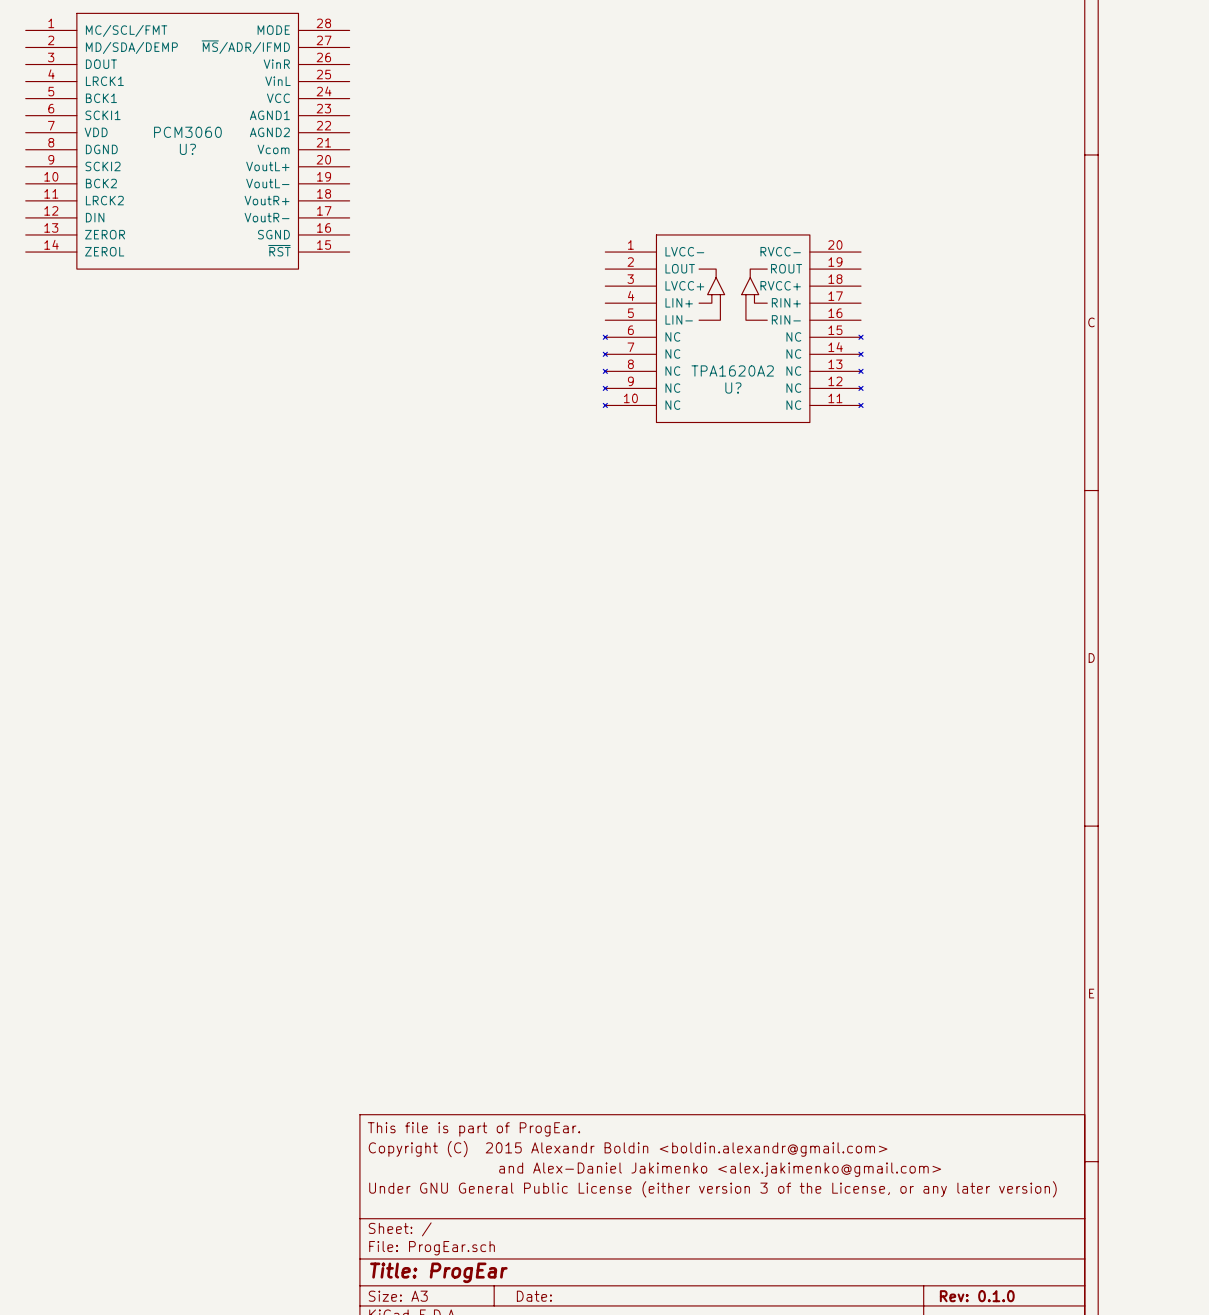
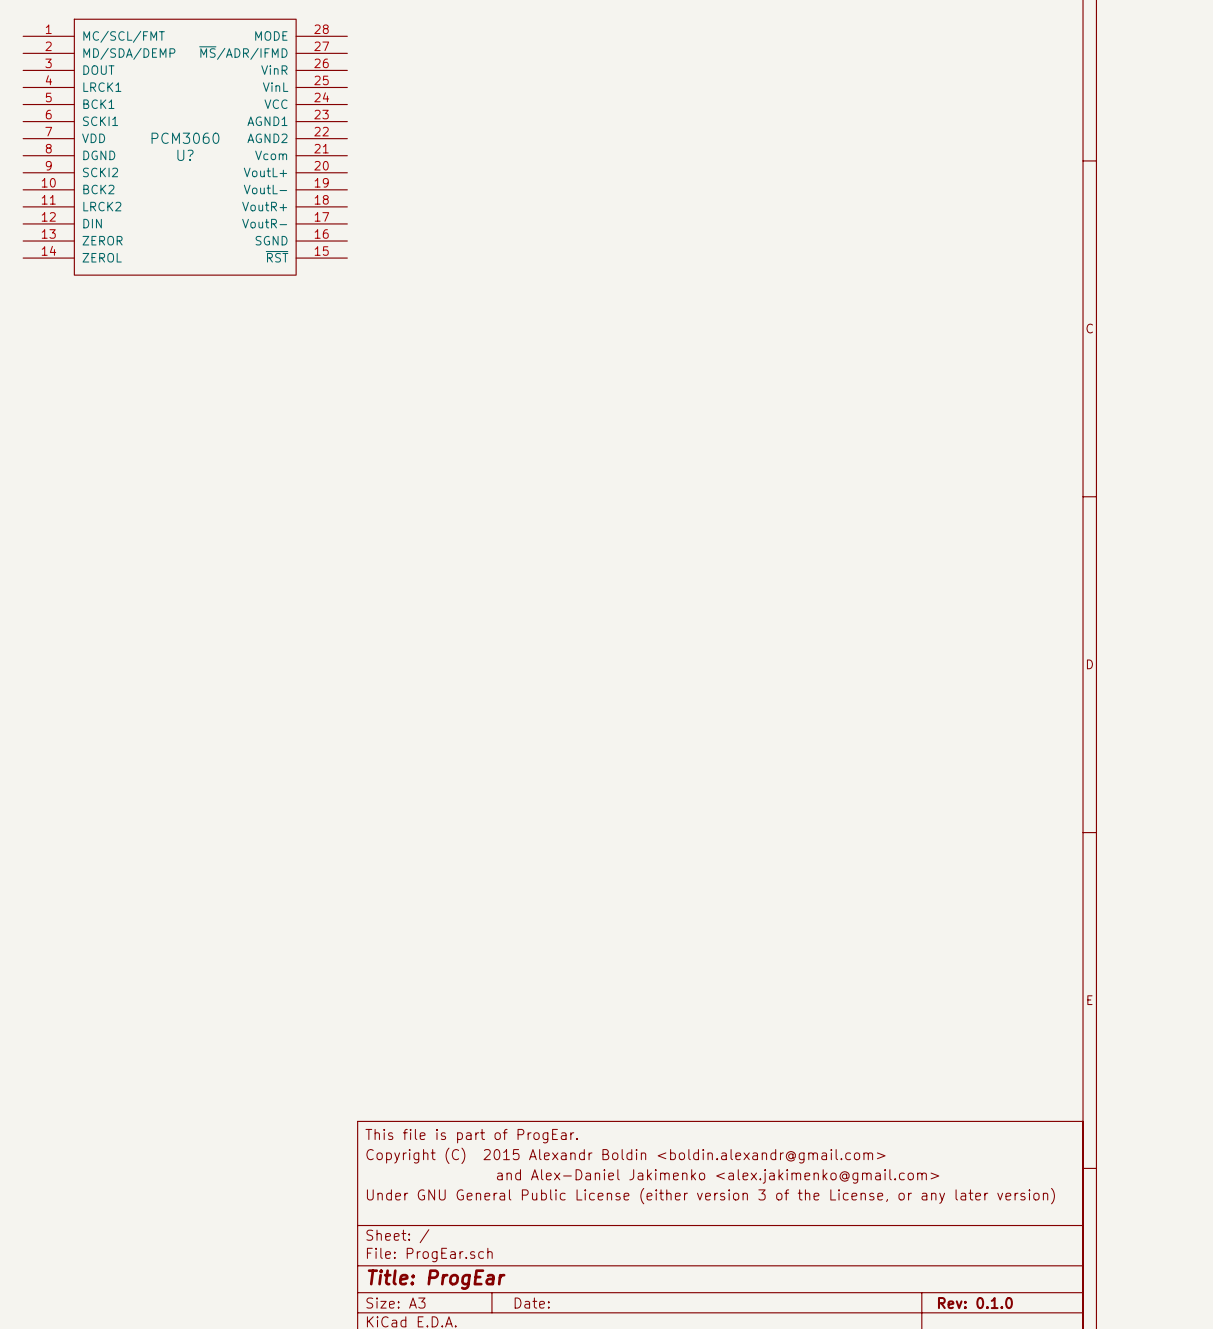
U?: TPA1620A2 (733, 328) -> none

